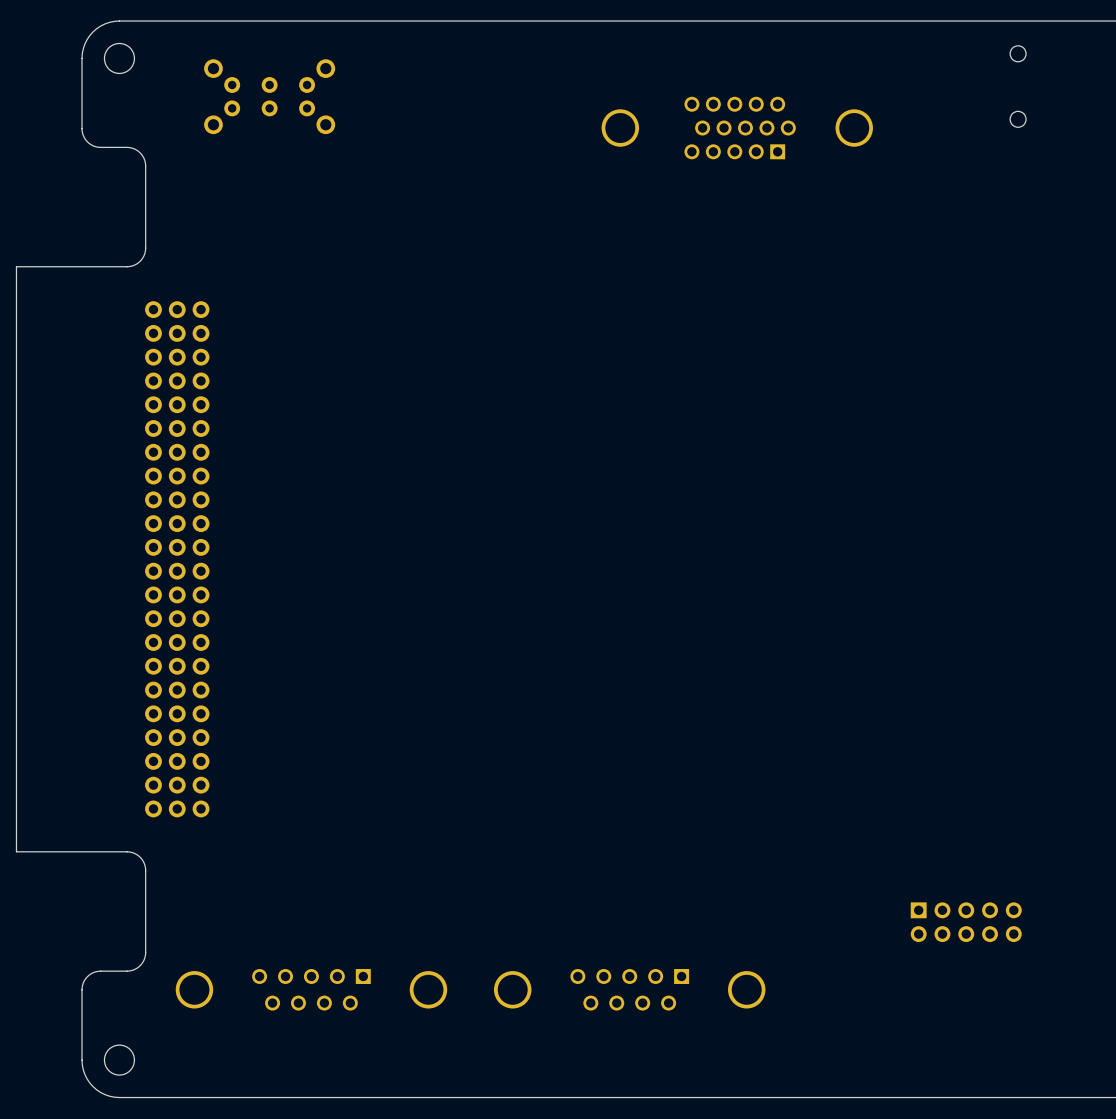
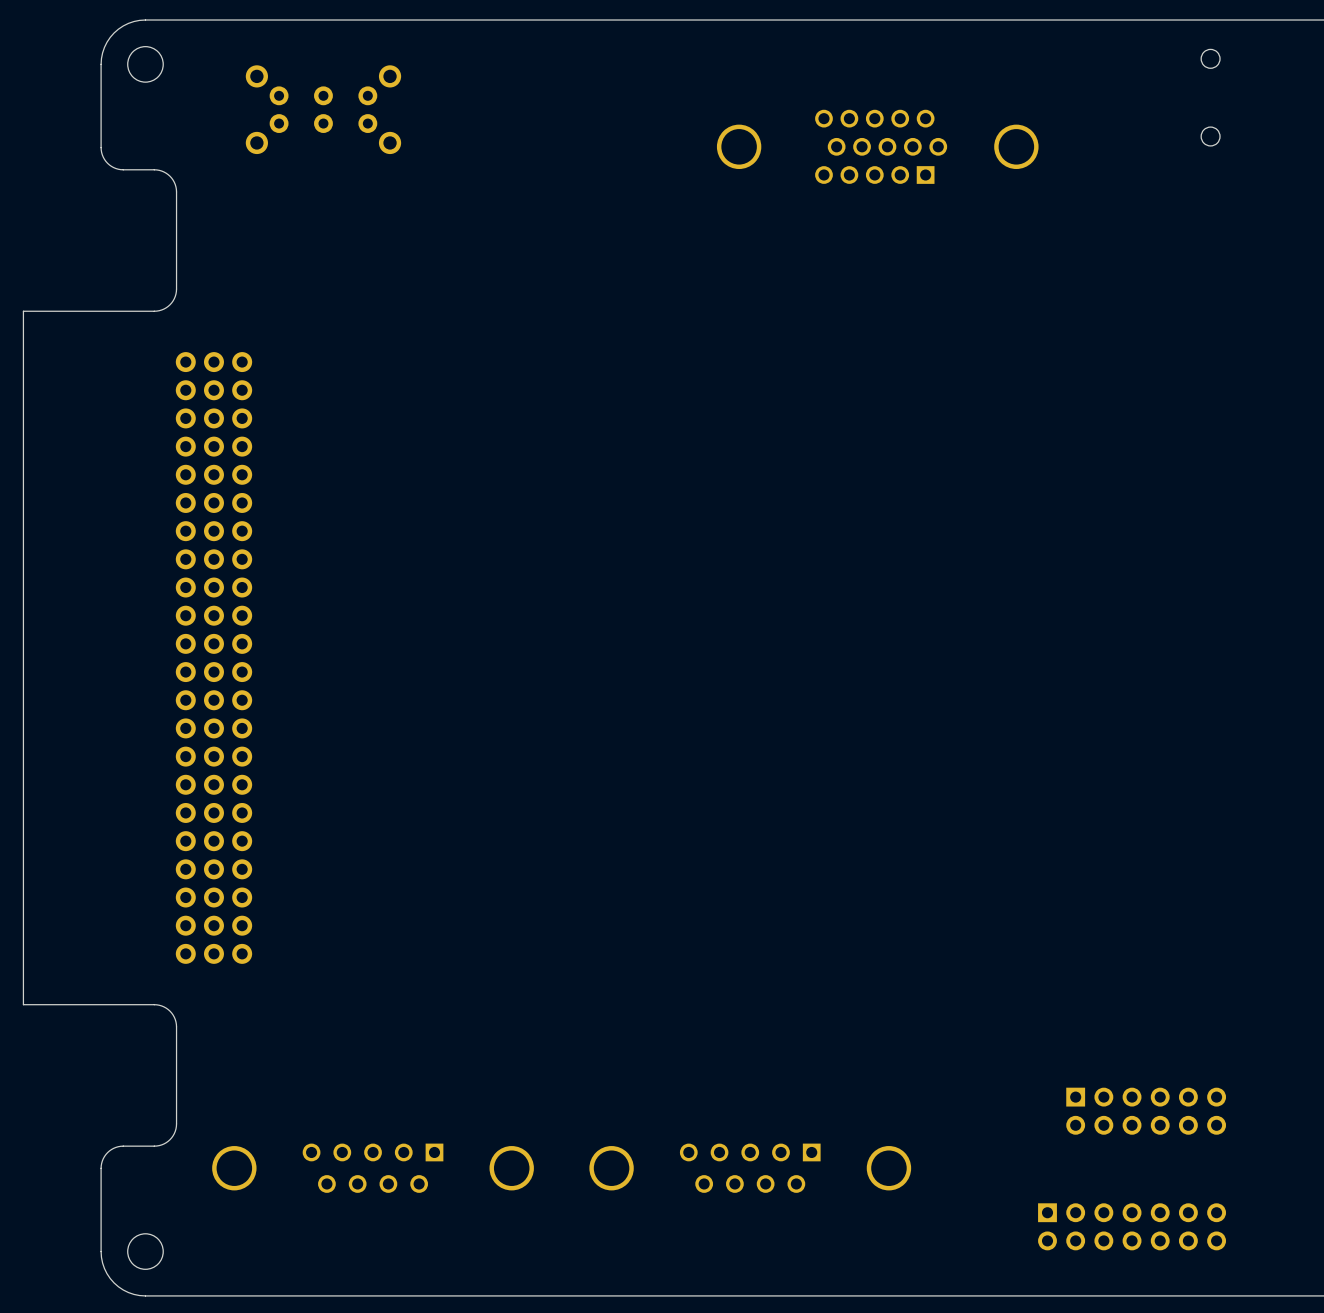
part: (966, 922) -> none
part: none -> (1146, 1111)
part: none -> (1132, 1226)

